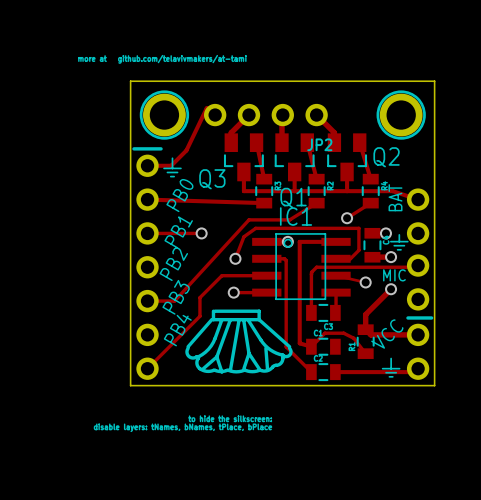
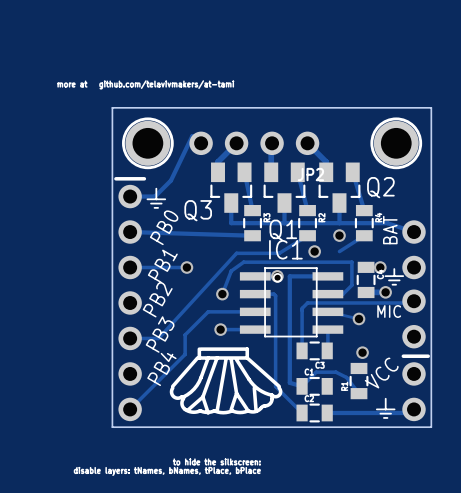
via: none -> (339, 235)
via: none -> (314, 251)
via: (347, 218) -> none
track: (391, 289) (365, 314) (365, 329) (370, 334) (418, 334) -> none
via position: (391, 289) -> (362, 352)

